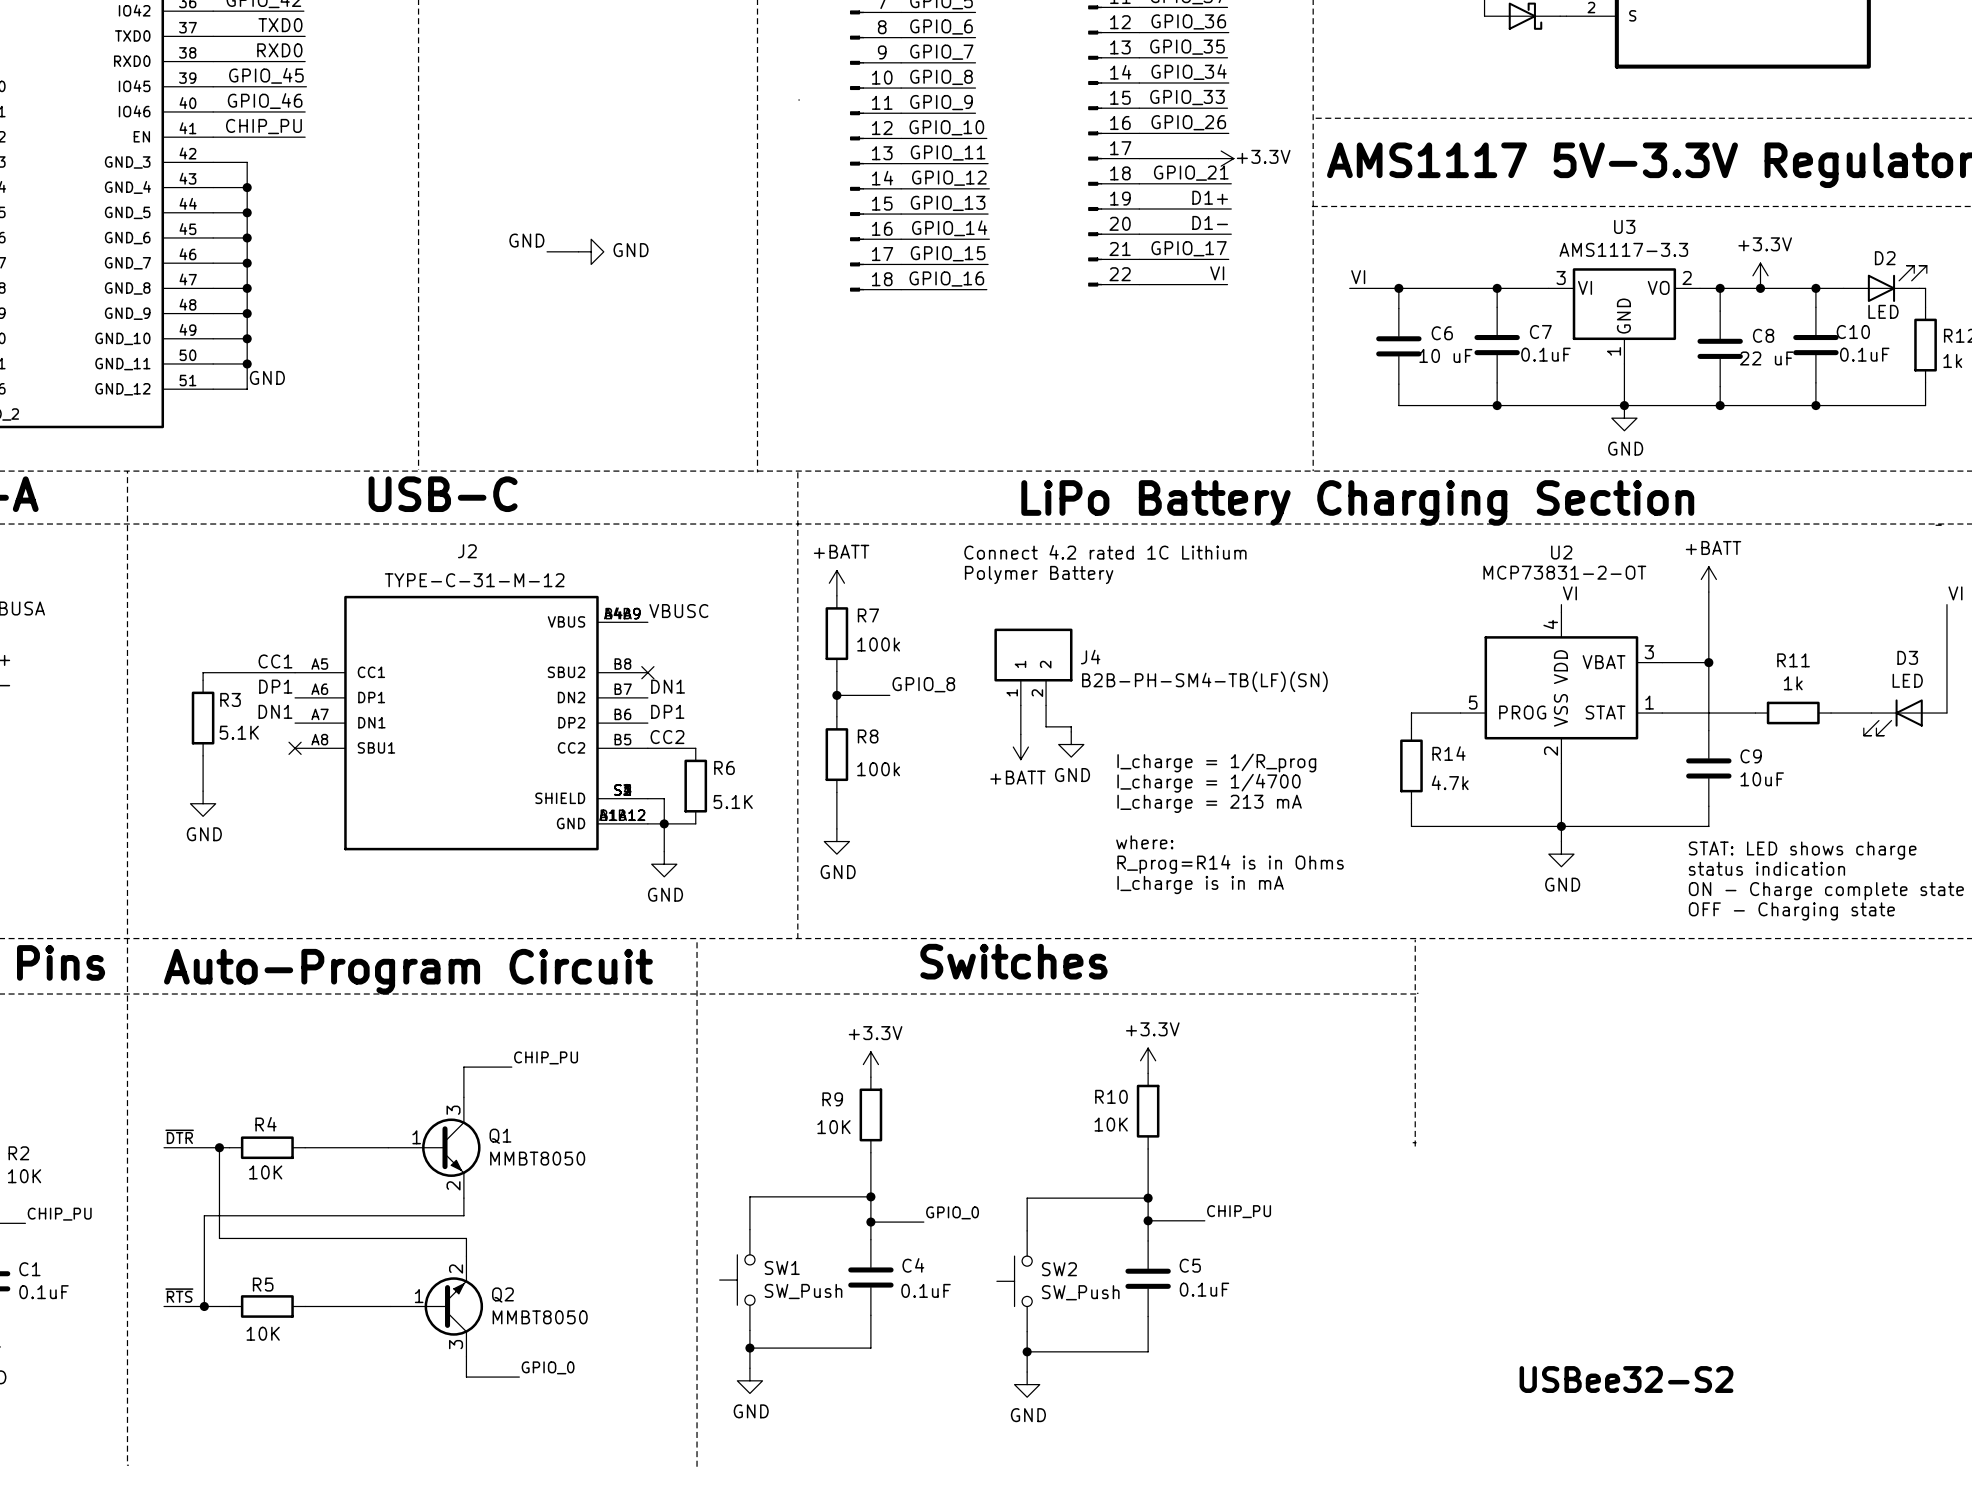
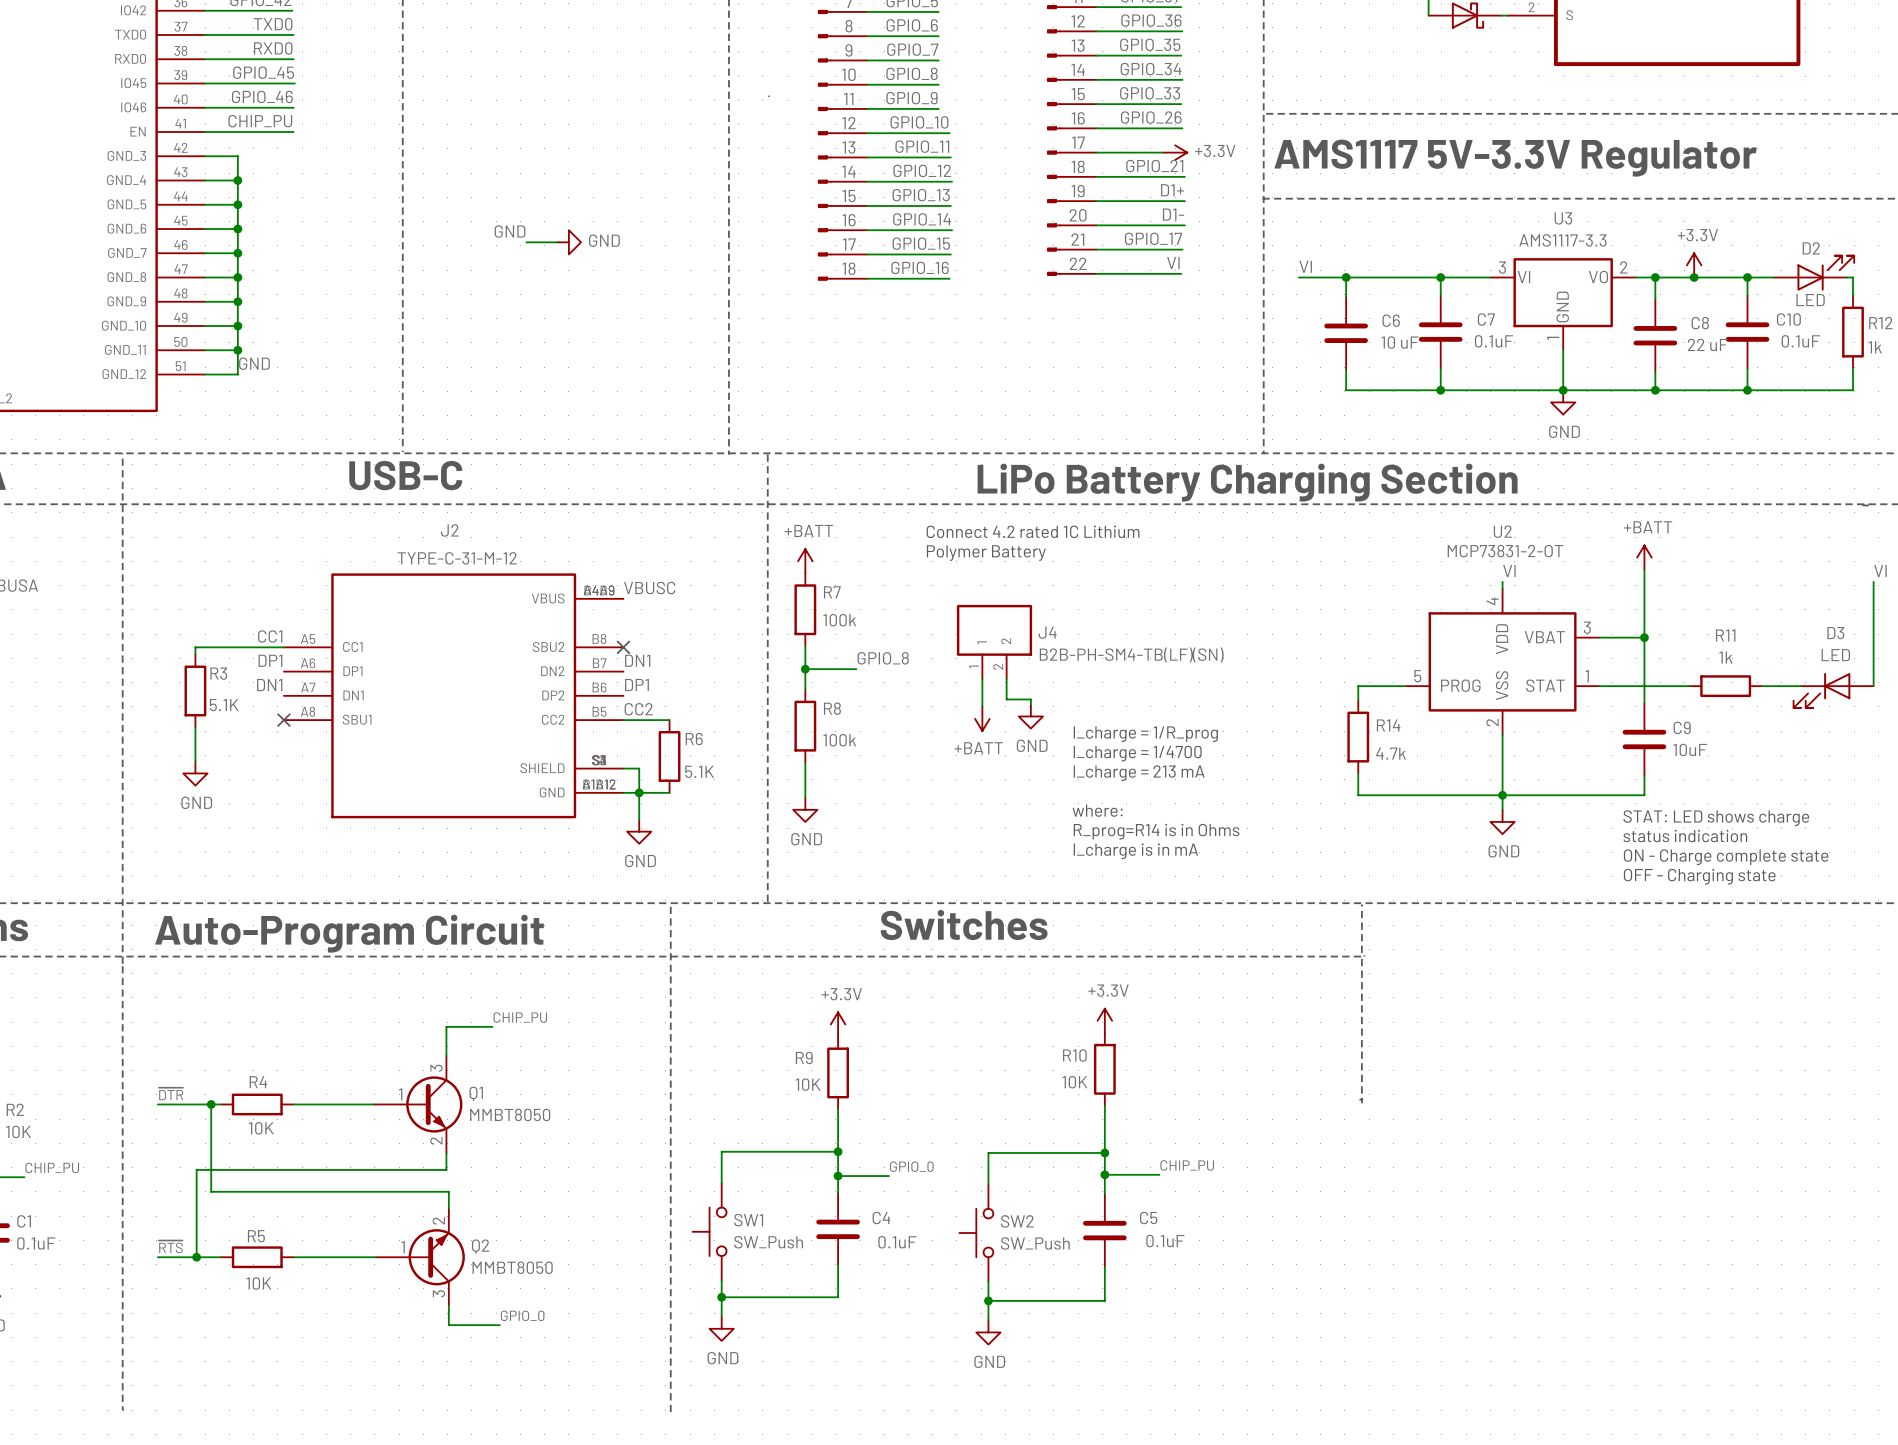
text: USBee32-S2 (1626, 1379) -> none

